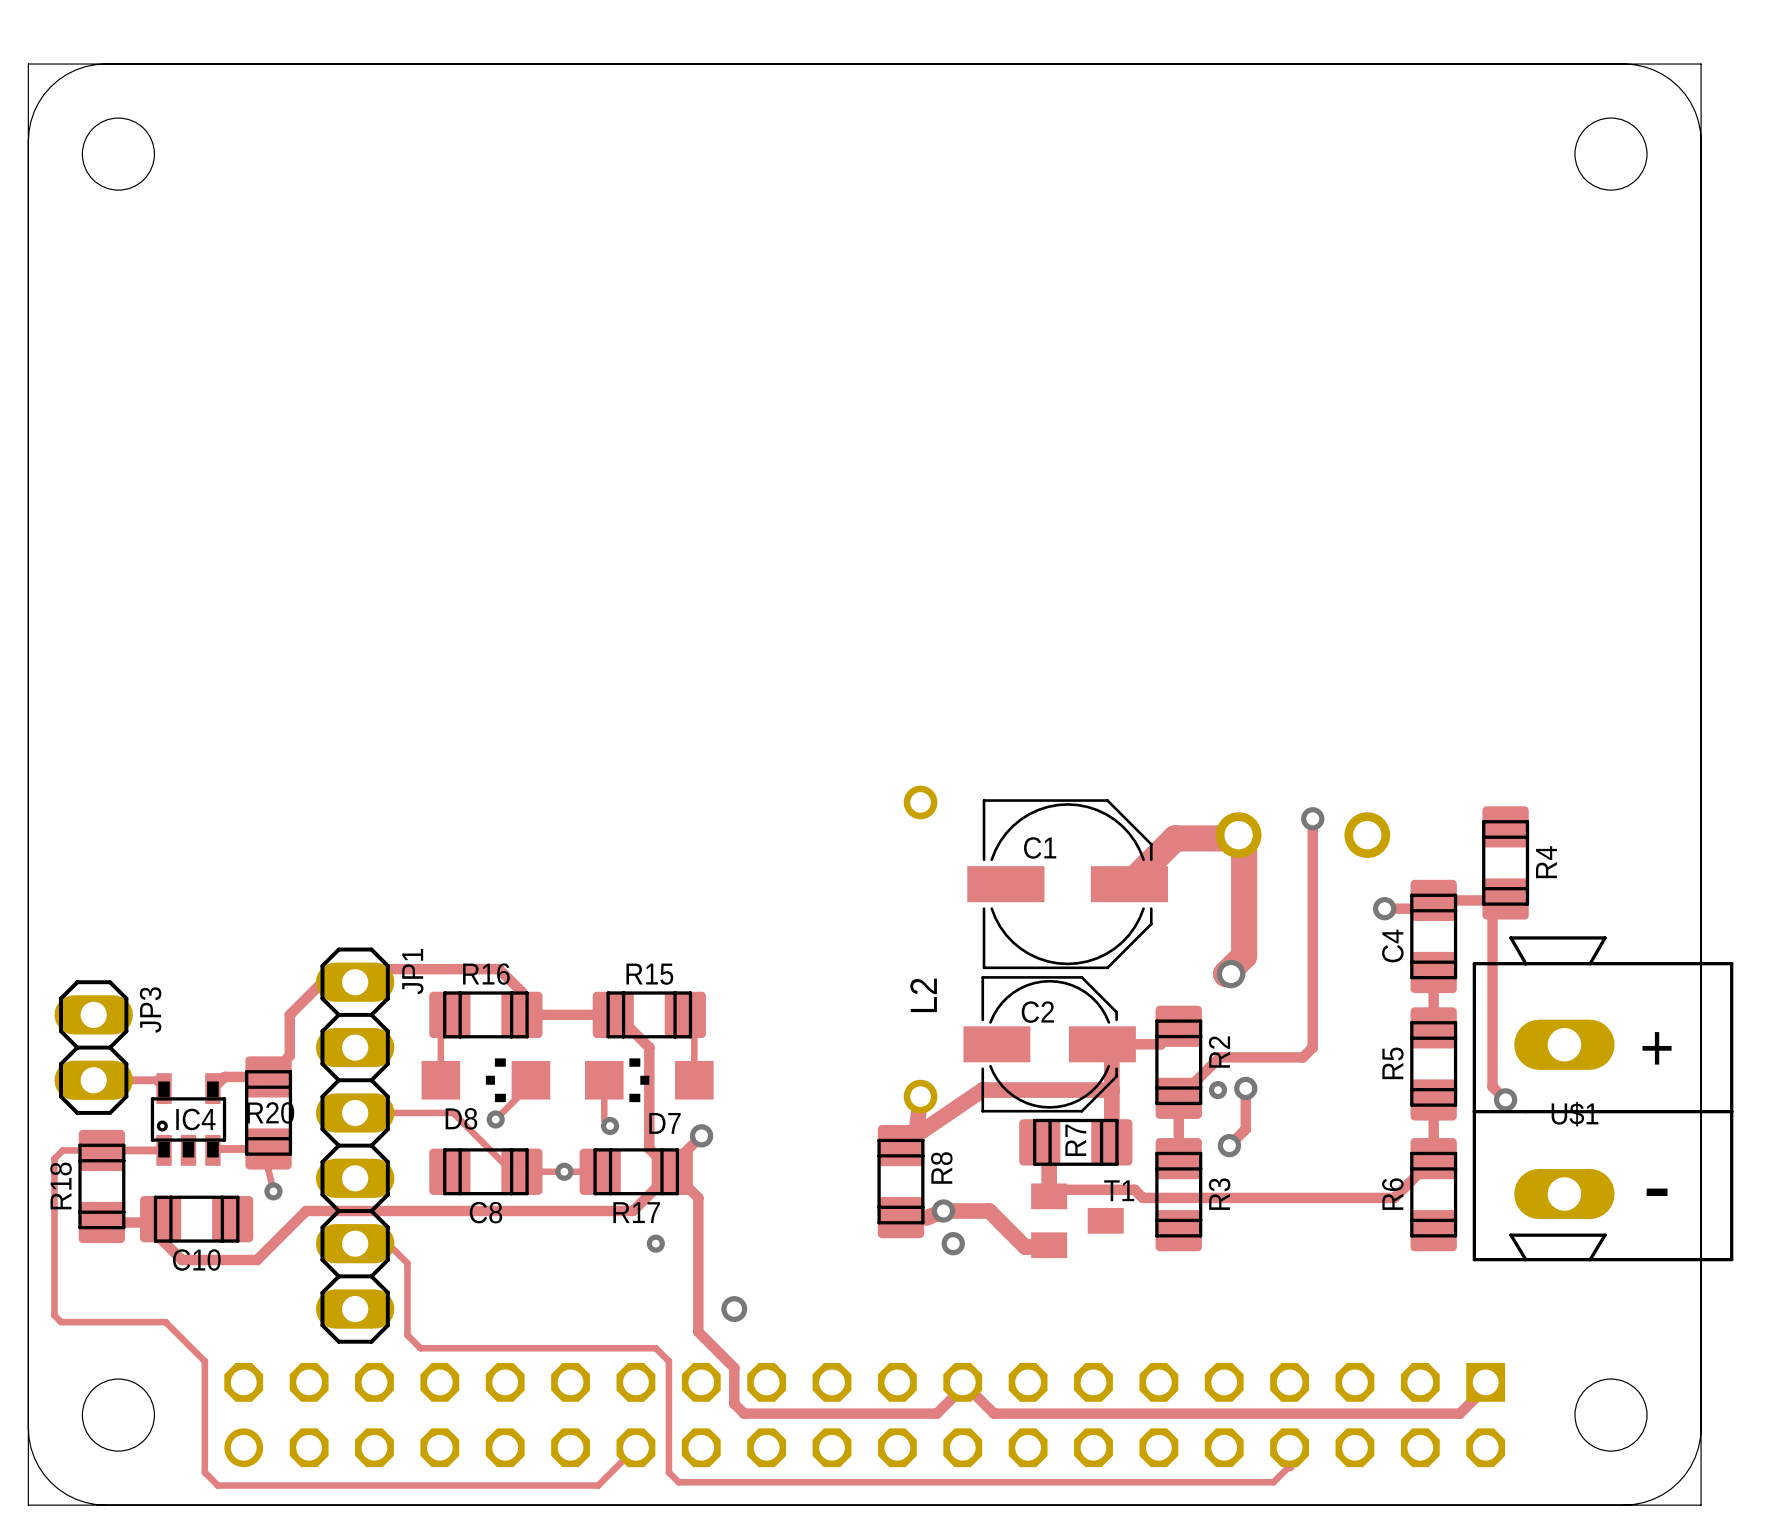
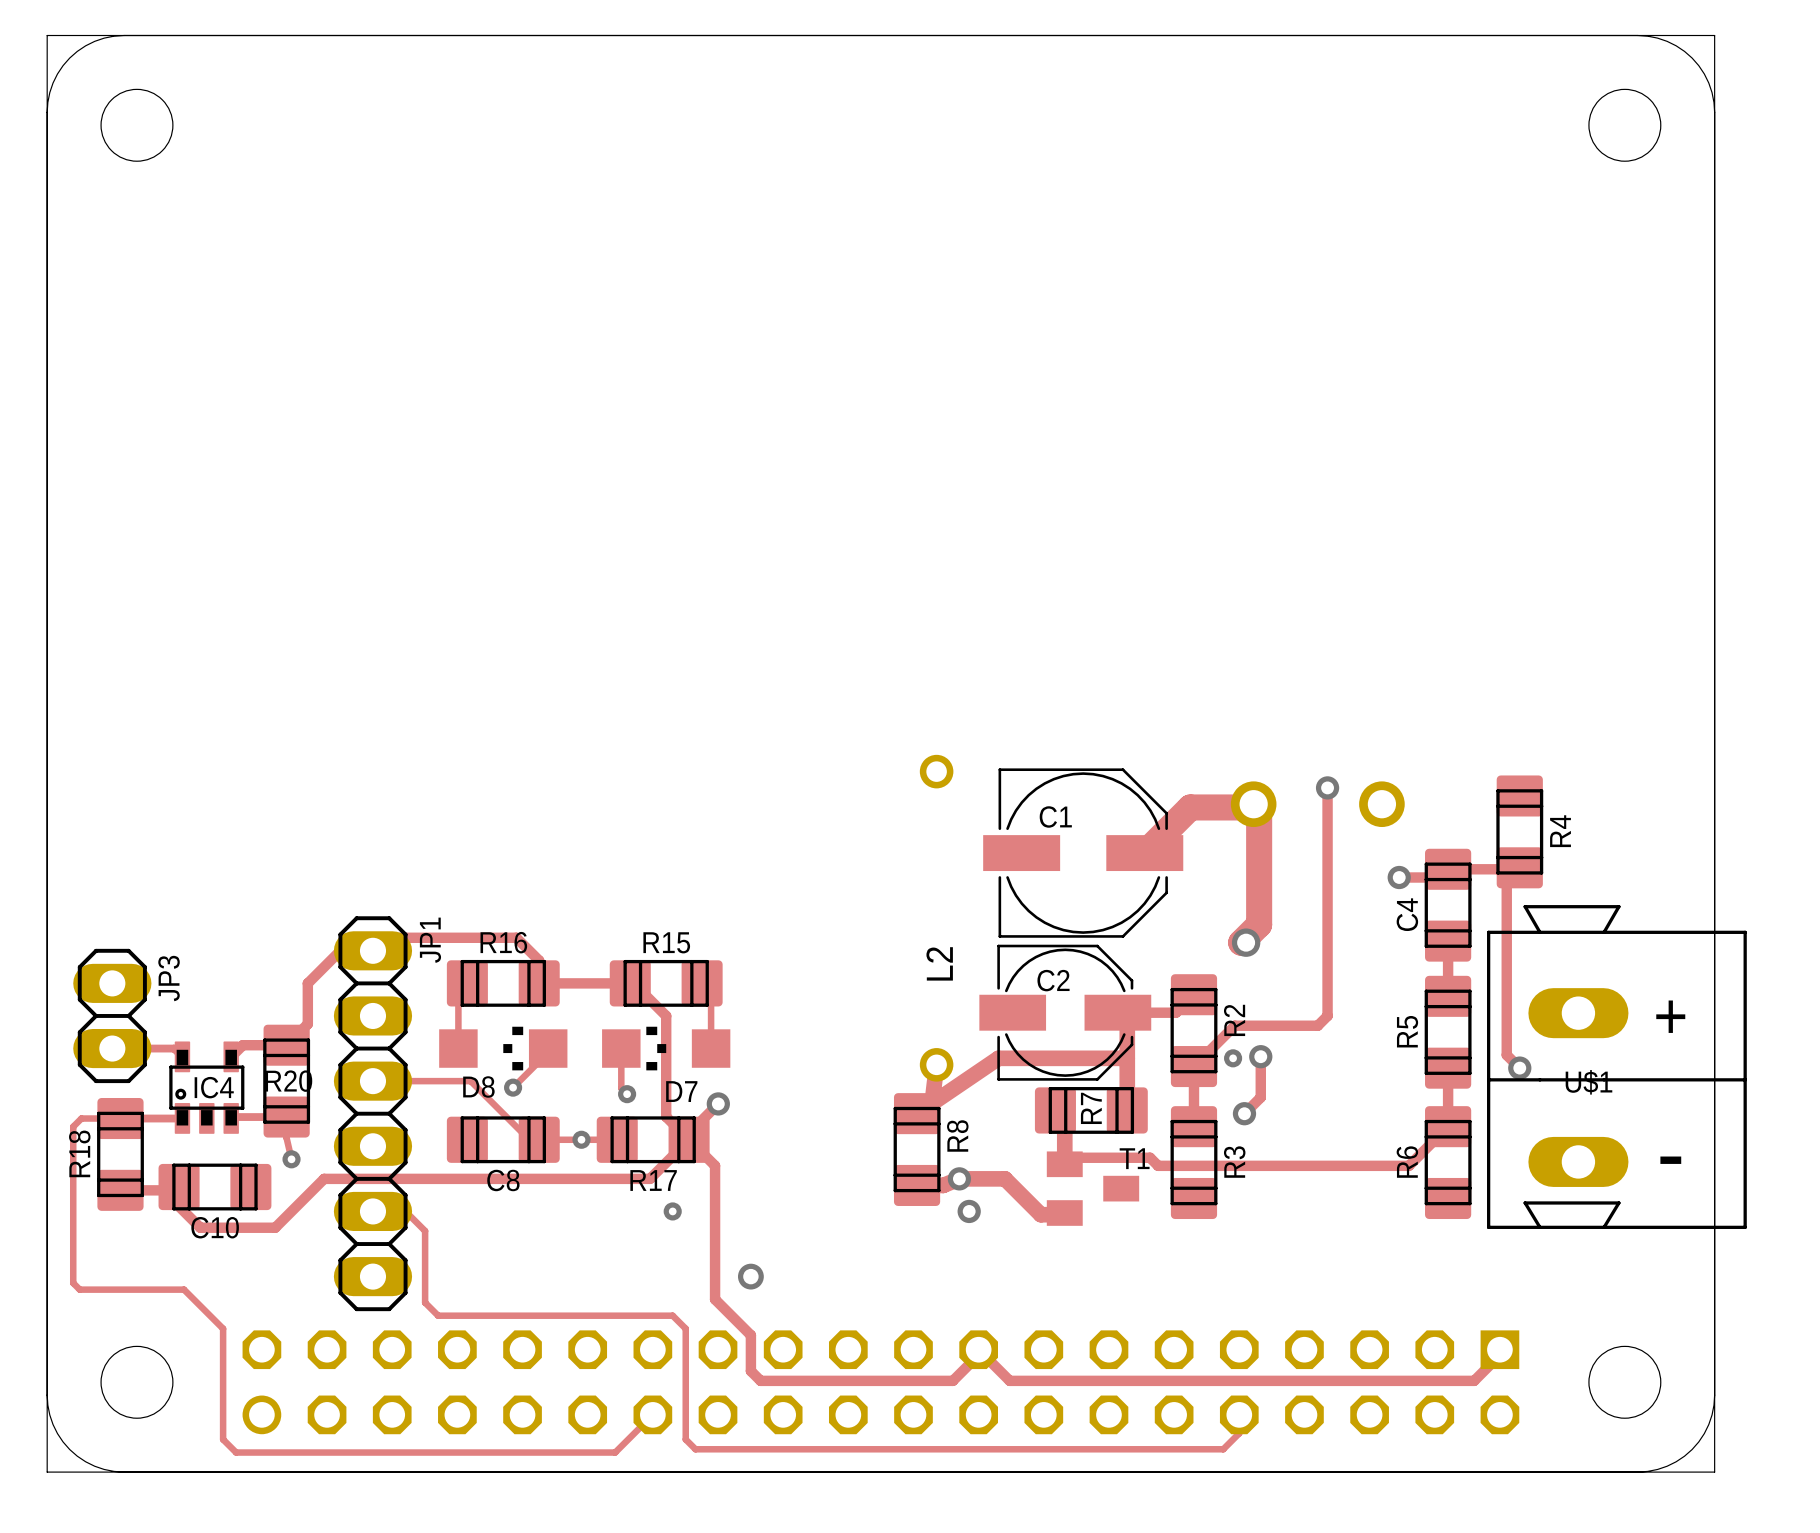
track: (1289, 1447) (1289, 1466) (1273, 1482) (1208, 1482) -> (1239, 1414) (1239, 1433) (1223, 1449)

